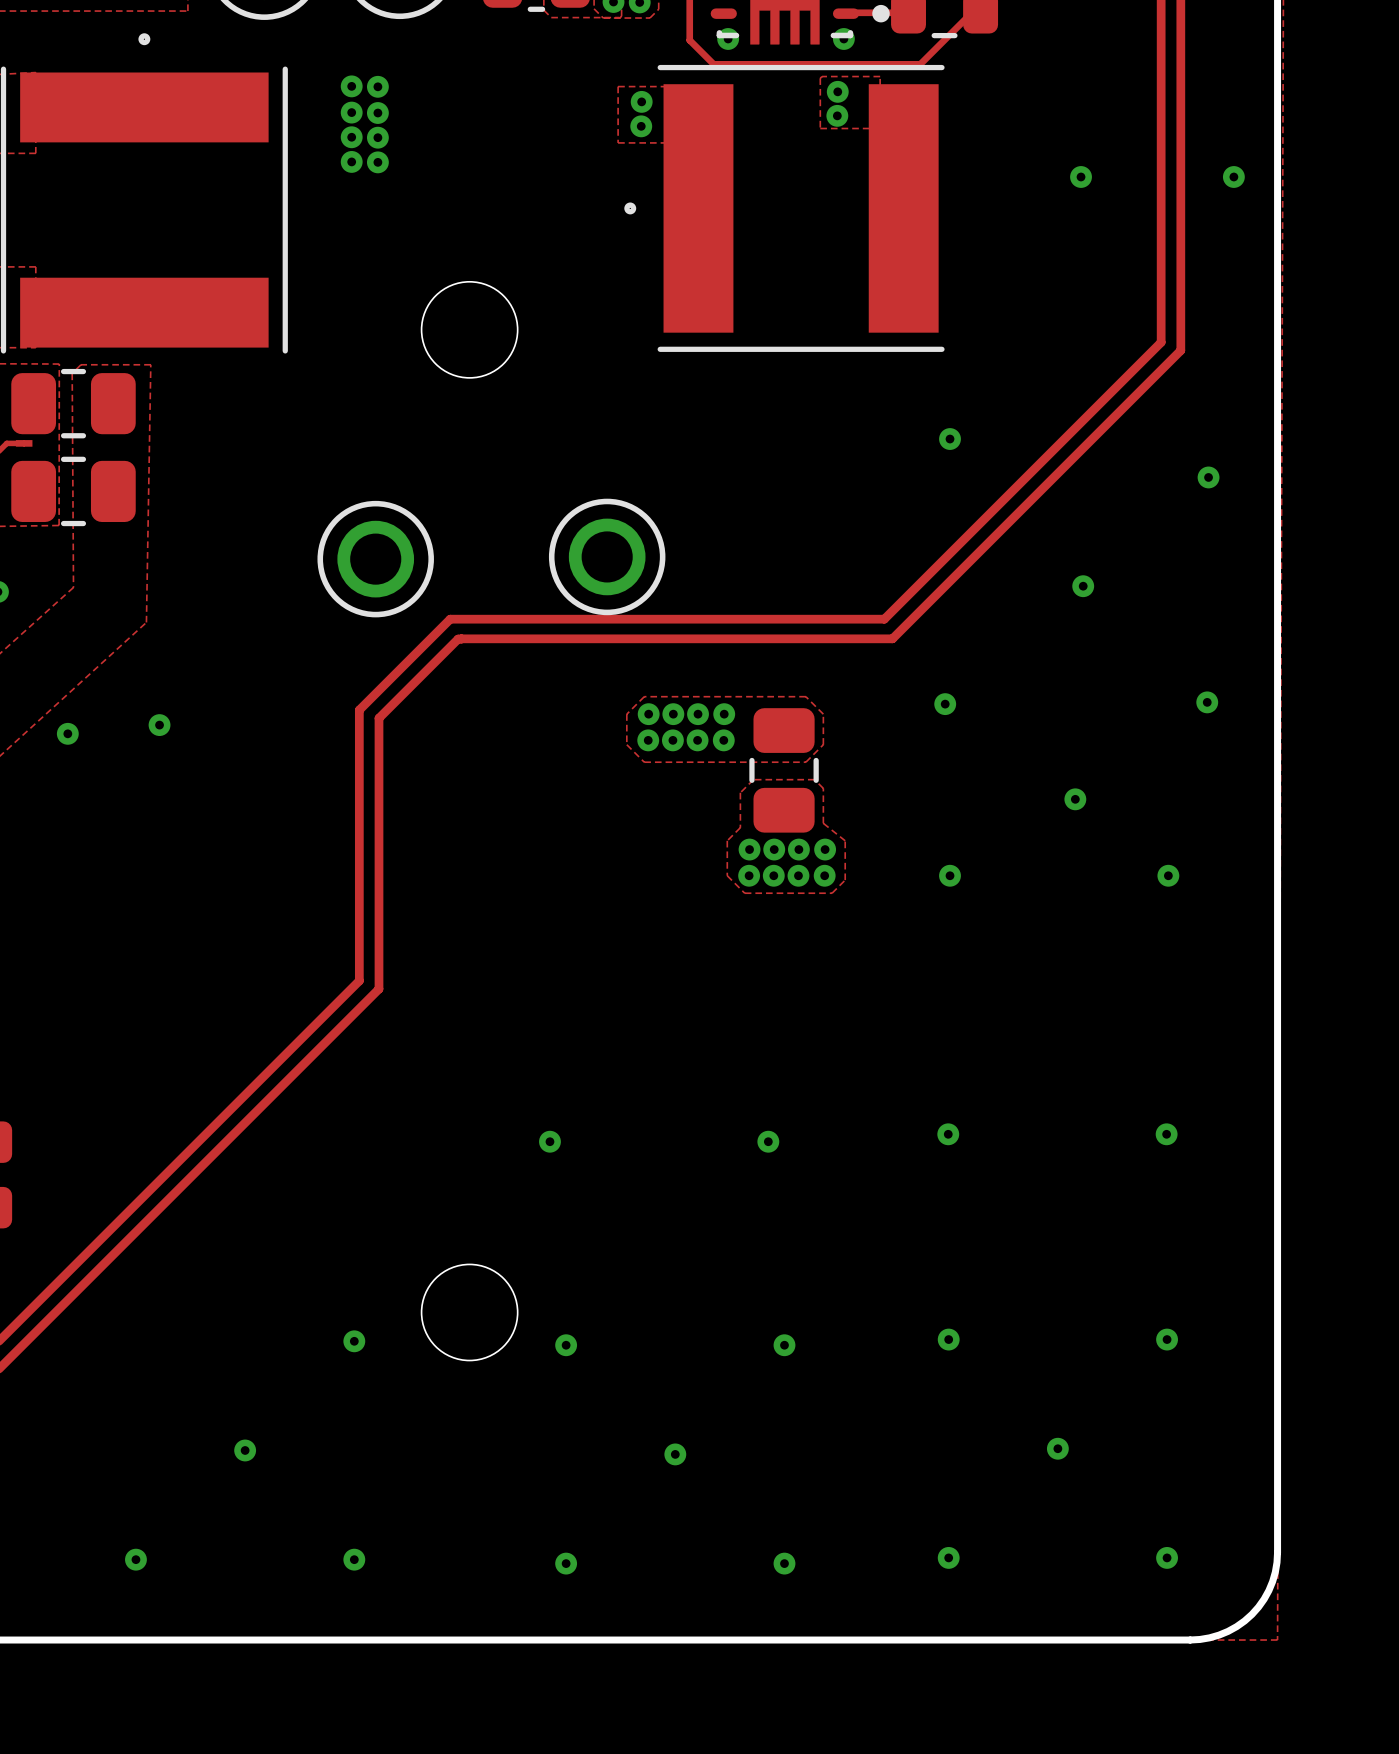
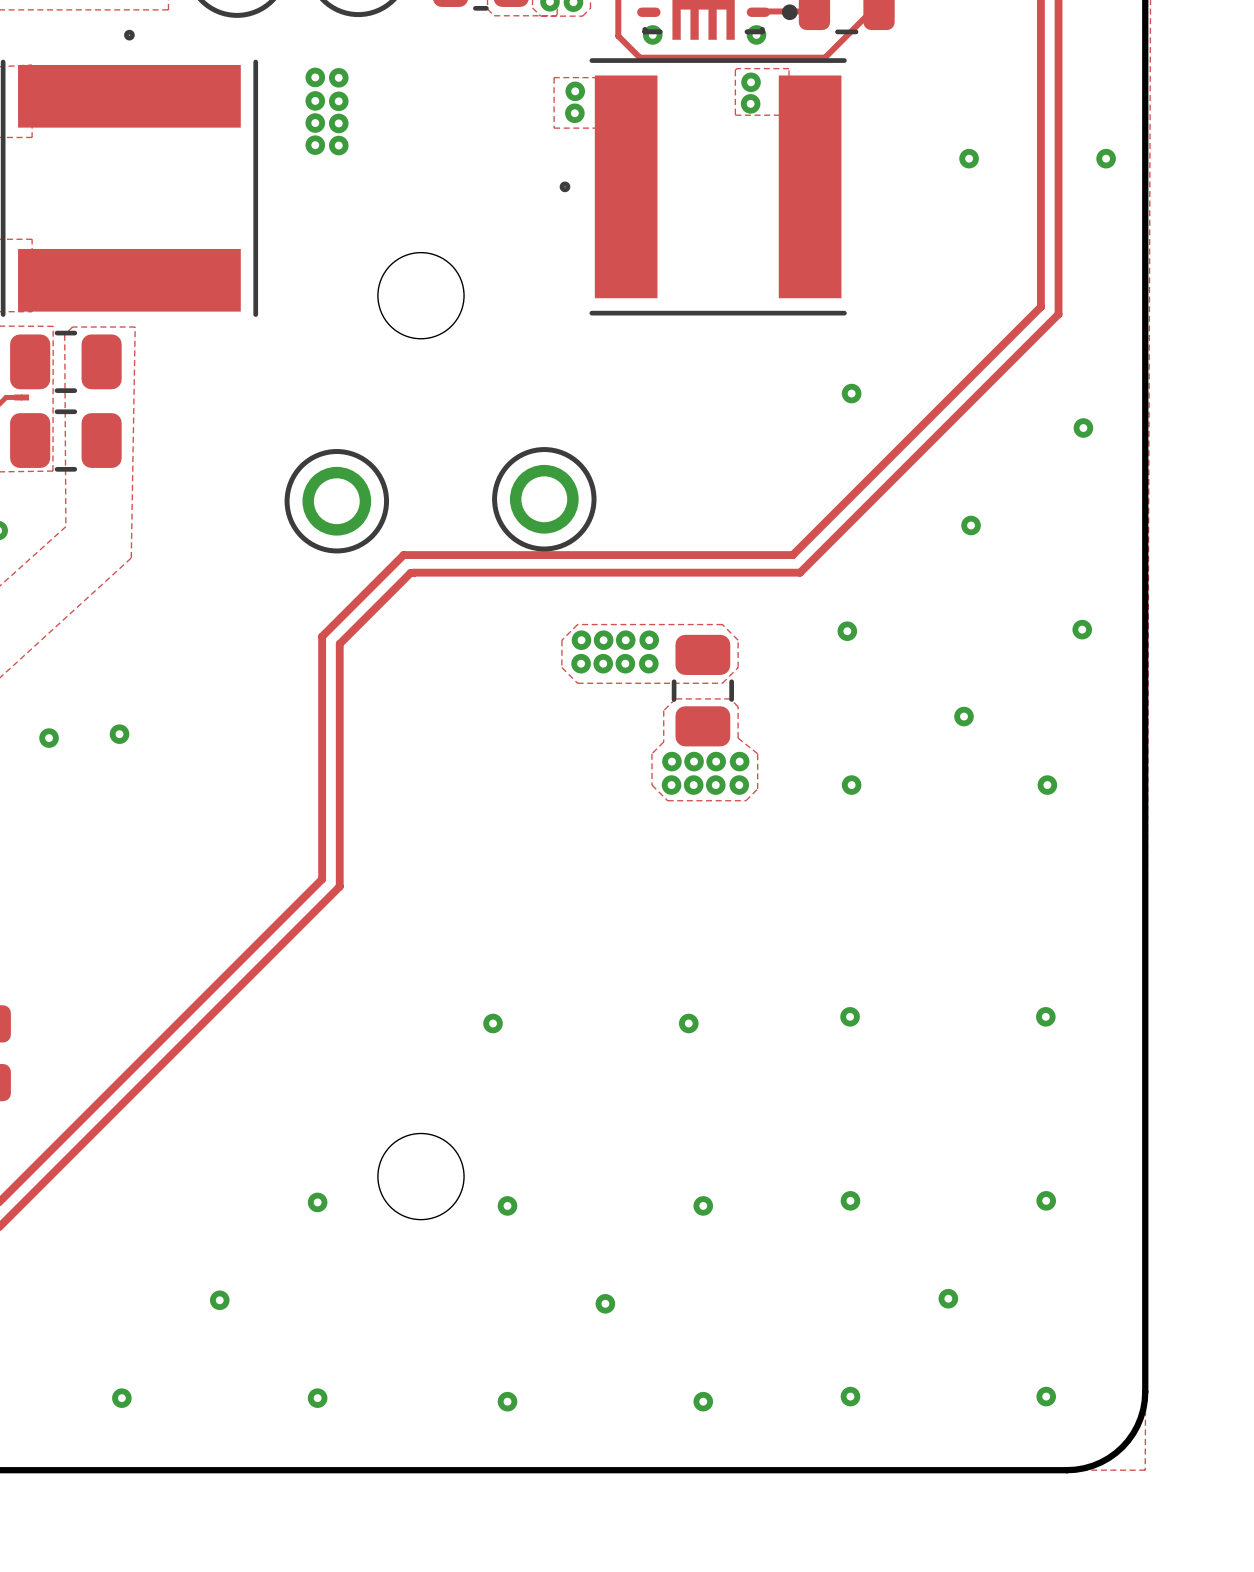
via: (159, 725) -> none
via: (67, 733) -> none
via: none -> (119, 734)
via: none -> (49, 738)

